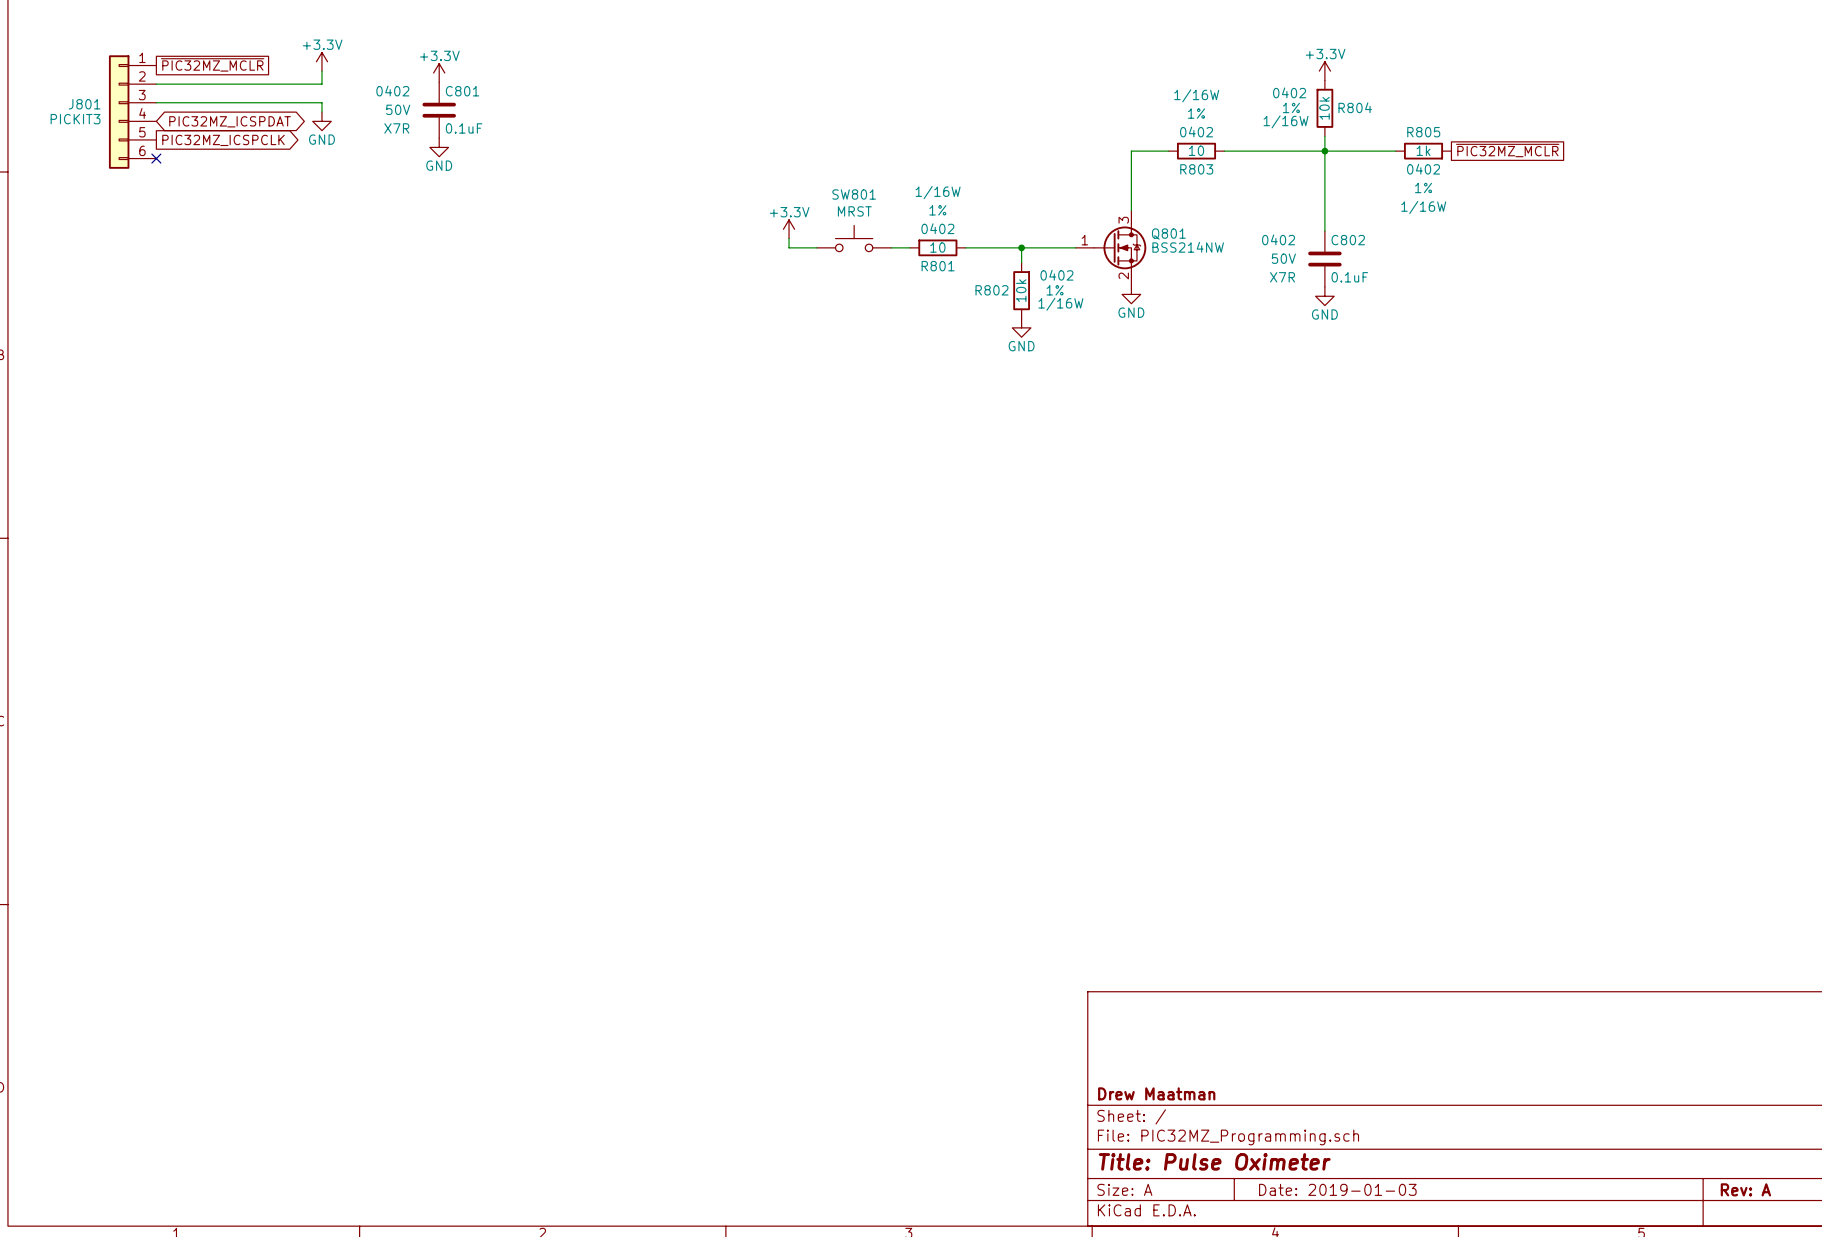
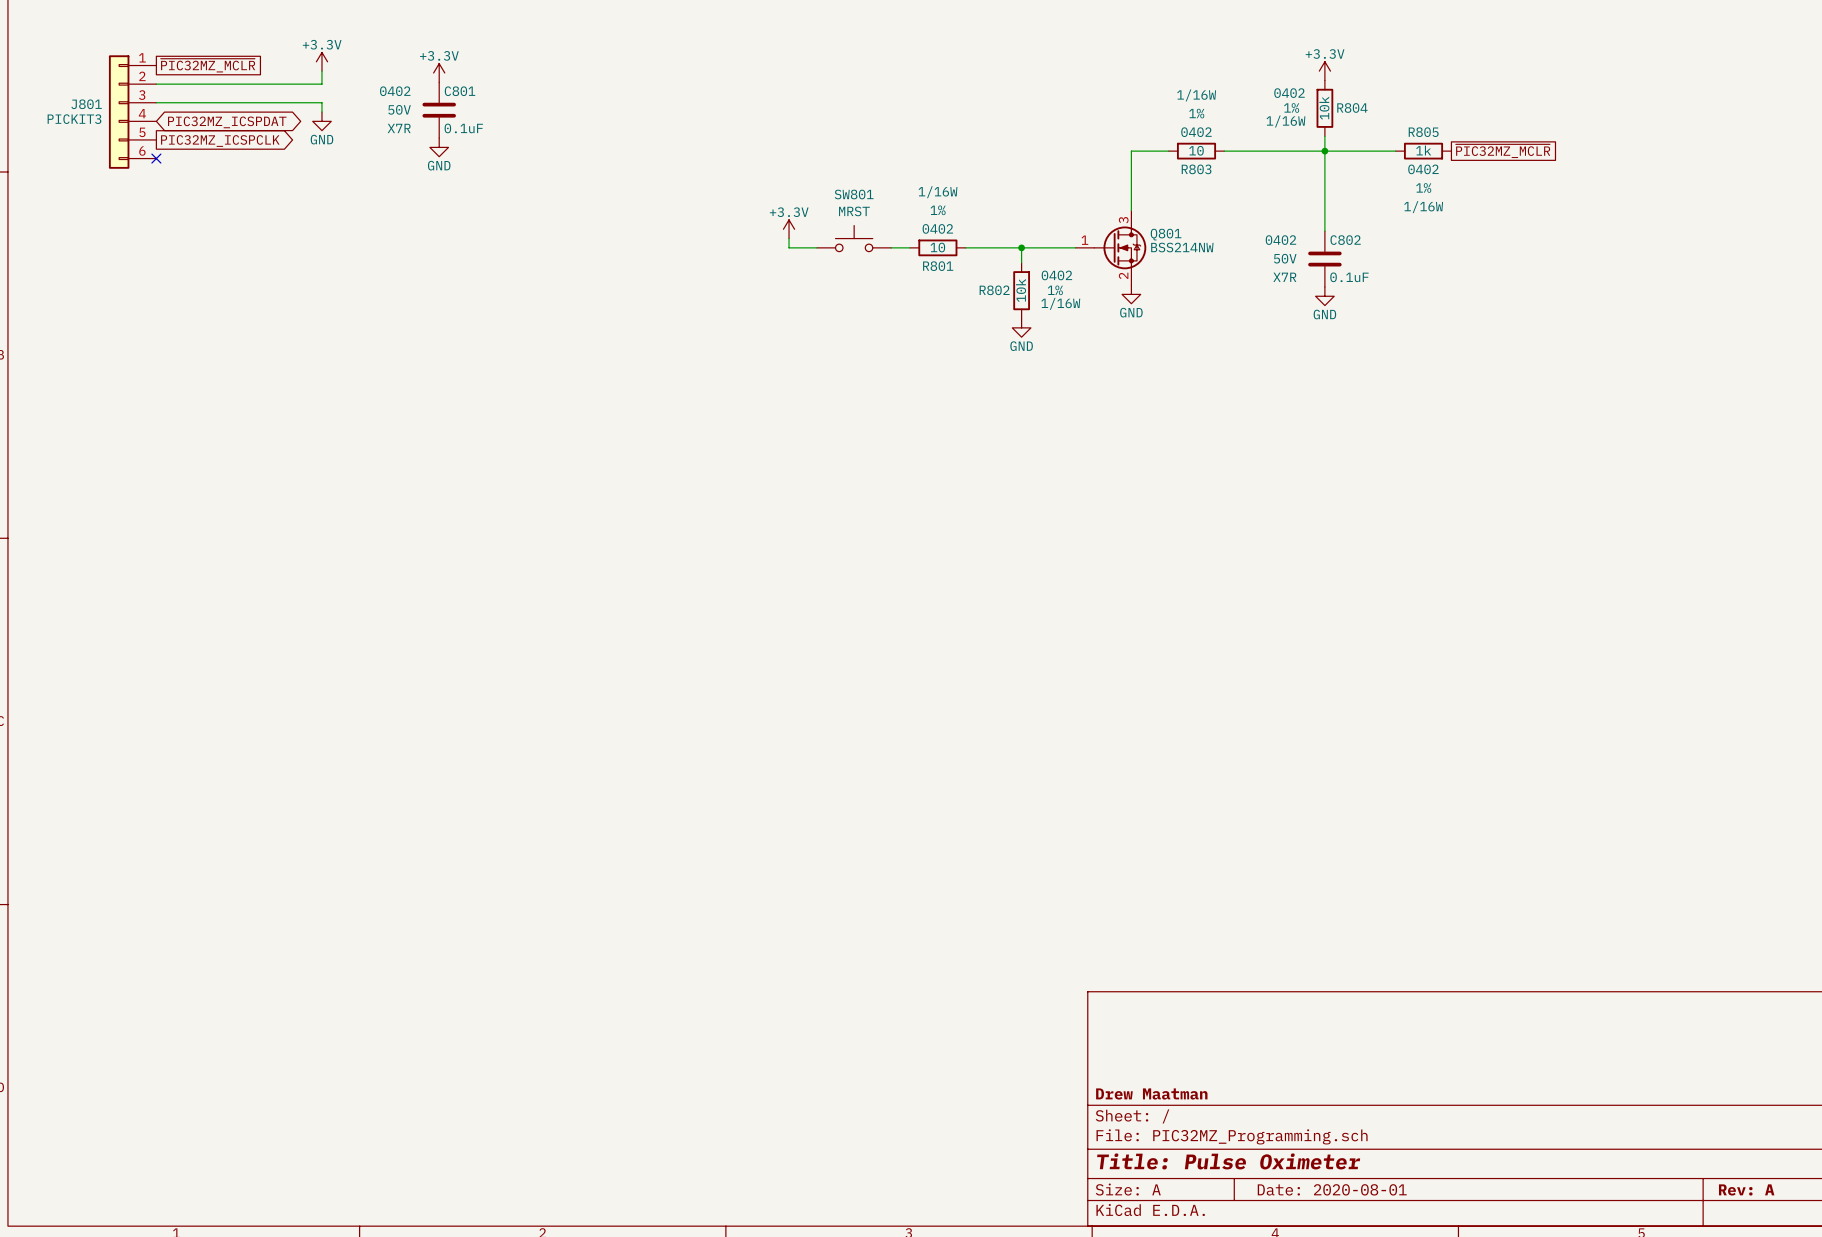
title block: Date: 2019-01-03 (1337, 1189) -> Date: 2020-08-01 (1332, 1189)

